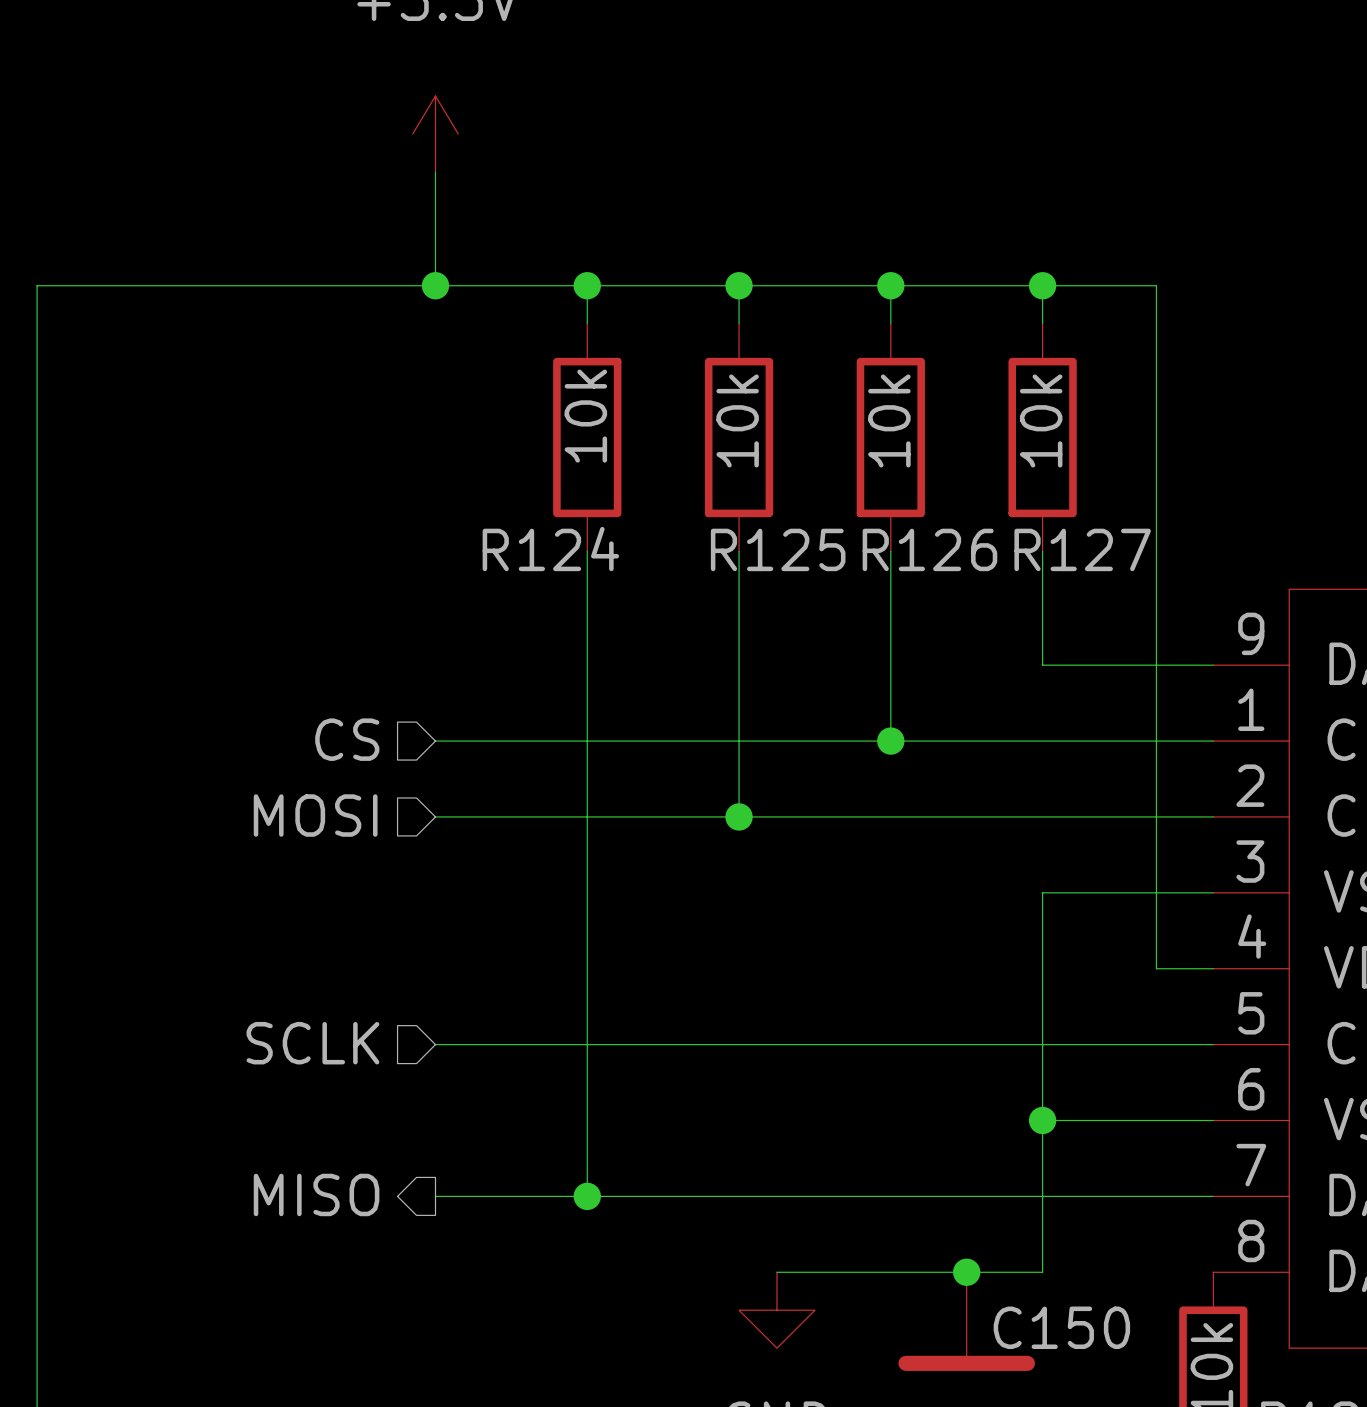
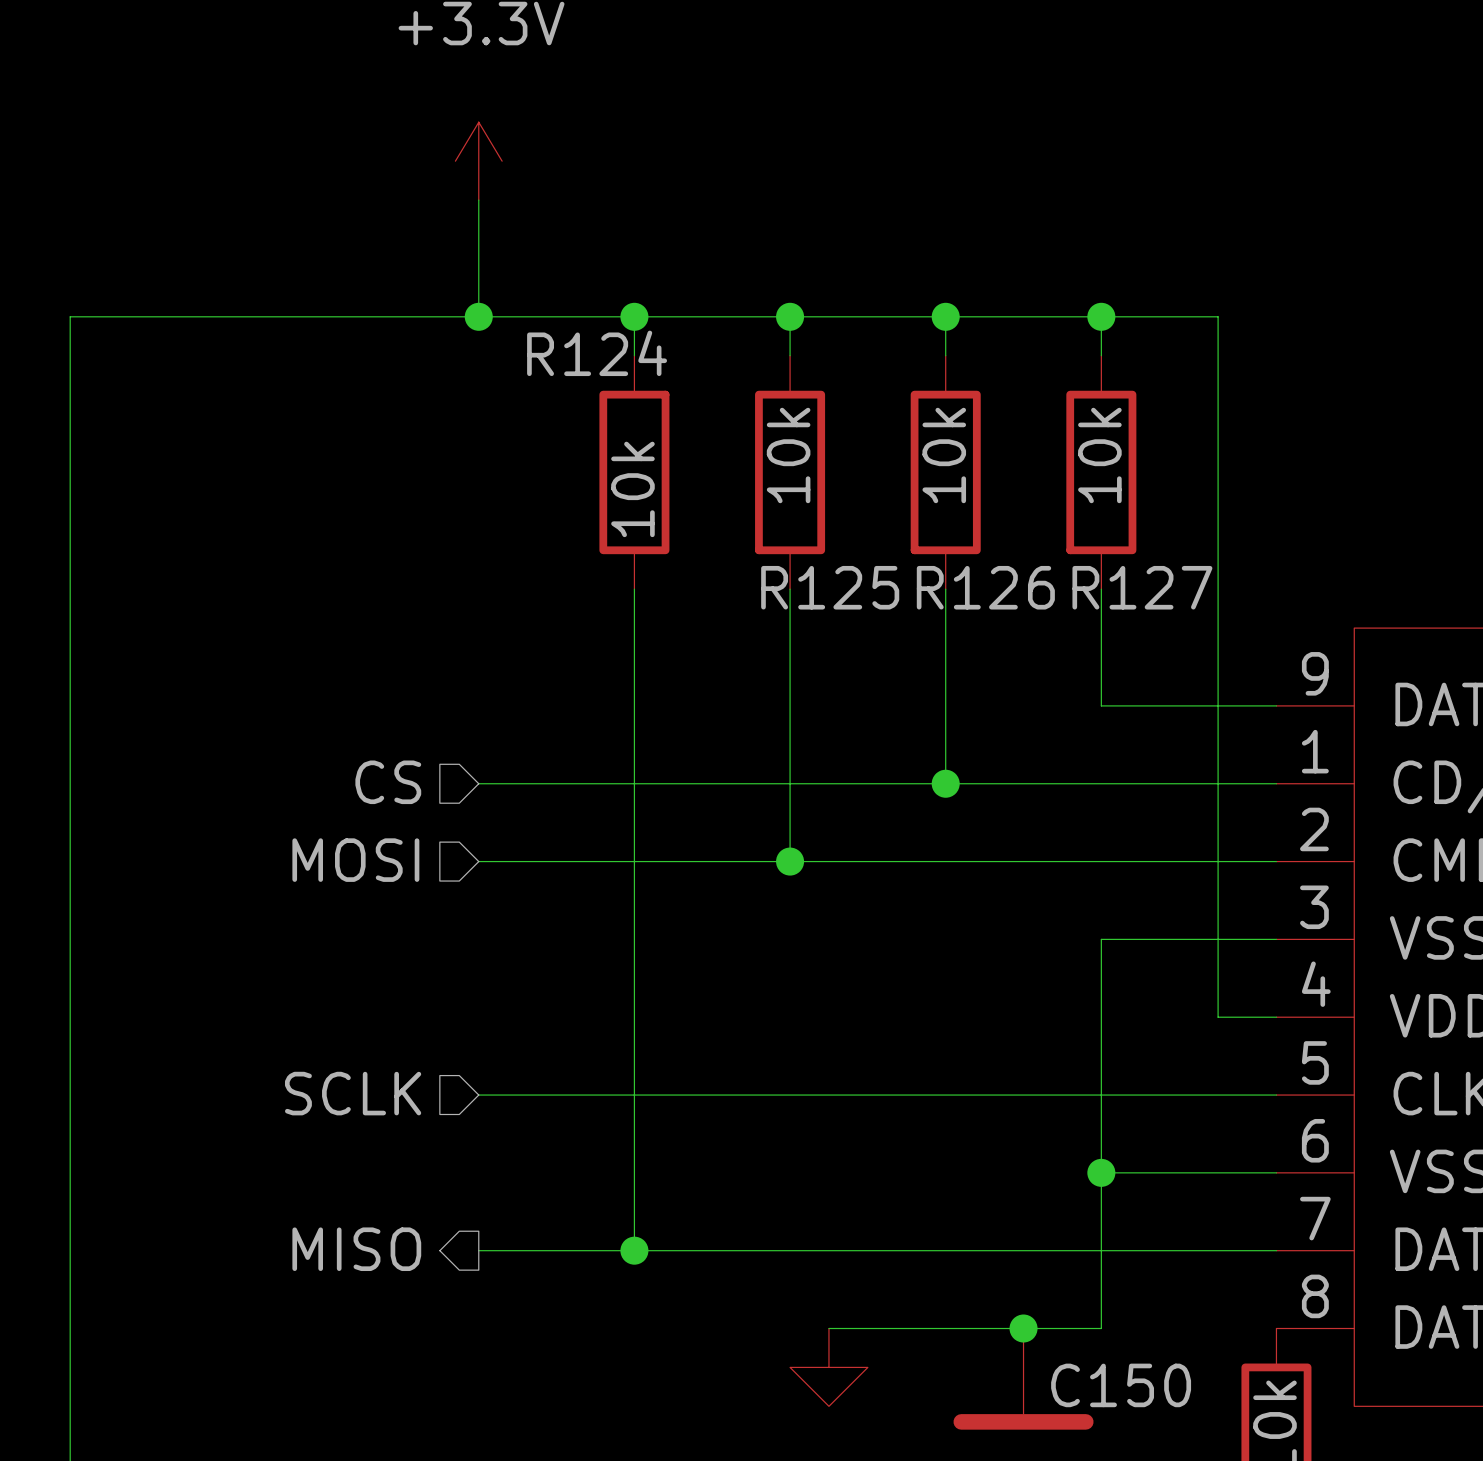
R124 value position: 10k (585, 416) -> 10k (632, 489)
R124 name position: R124 (550, 549) -> R124 (597, 353)

